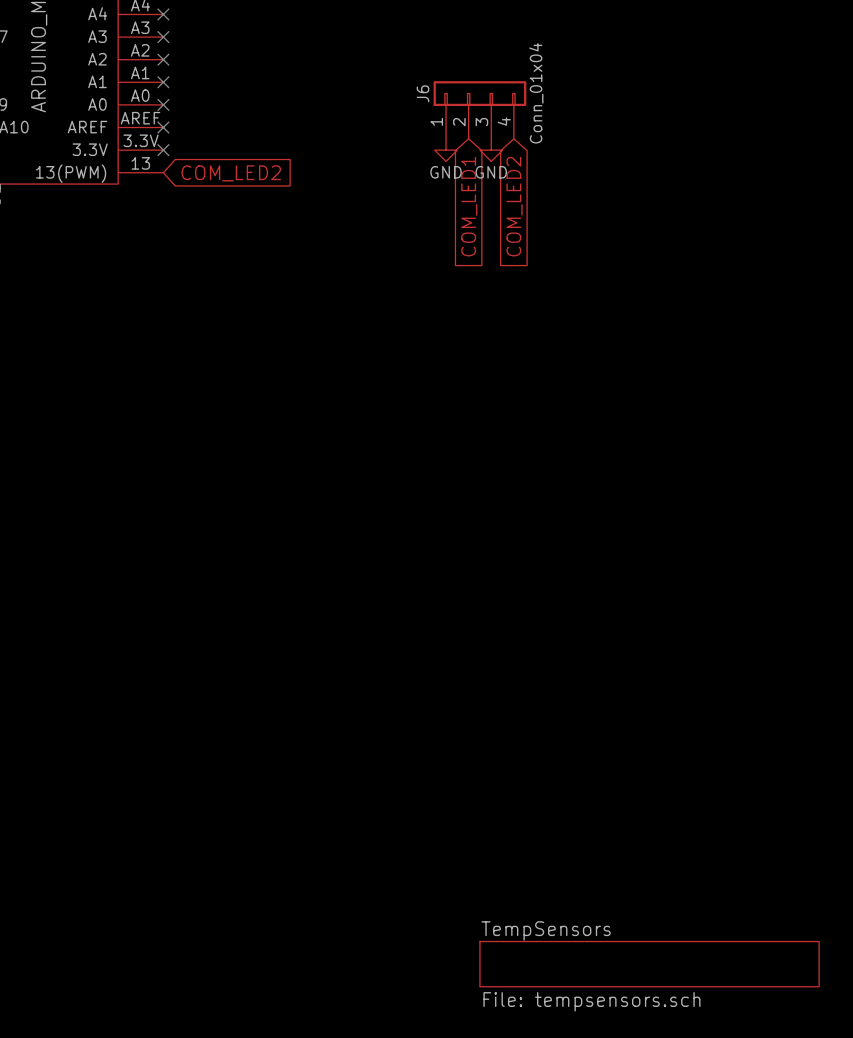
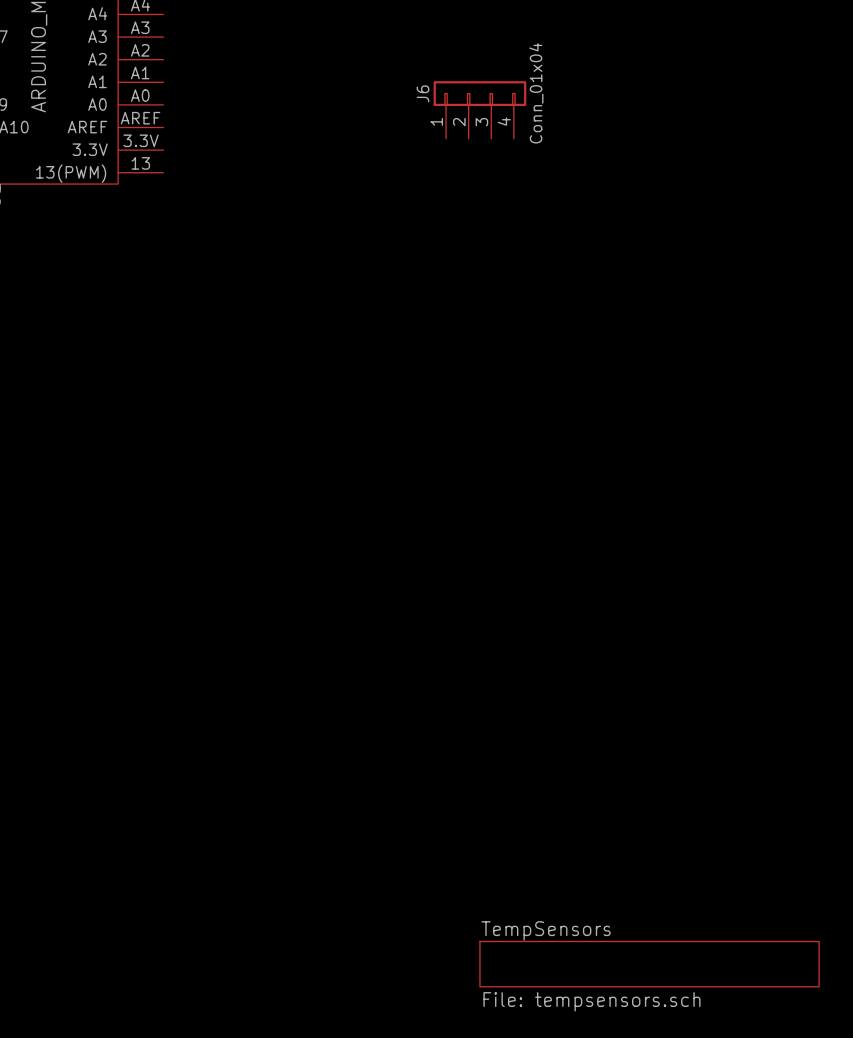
no-connect mark: (163, 14) -> none
no-connect mark: (163, 37) -> none
no-connect mark: (163, 59) -> none
no-connect mark: (163, 82) -> none
no-connect mark: (163, 104) -> none
no-connect mark: (163, 127) -> none
no-connect mark: (163, 150) -> none
power symbol: GND (446, 150) -> none
power symbol: GND (491, 150) -> none
global label: COM_LED2 (231, 173) -> none
global label: COM_LED1 (469, 206) -> none
global label: COM_LED2 (514, 206) -> none

